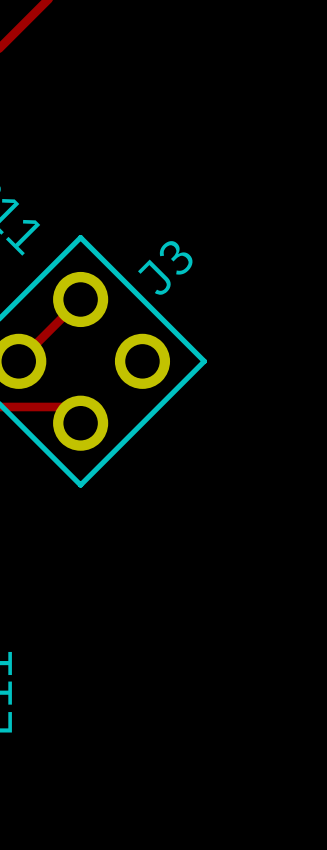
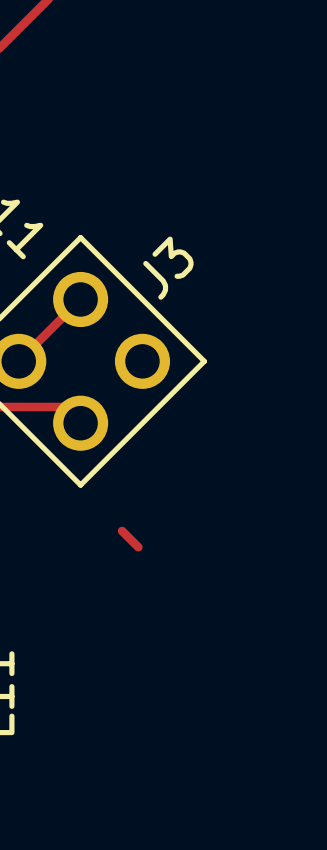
track: none -> (122, 530) (138, 547)

